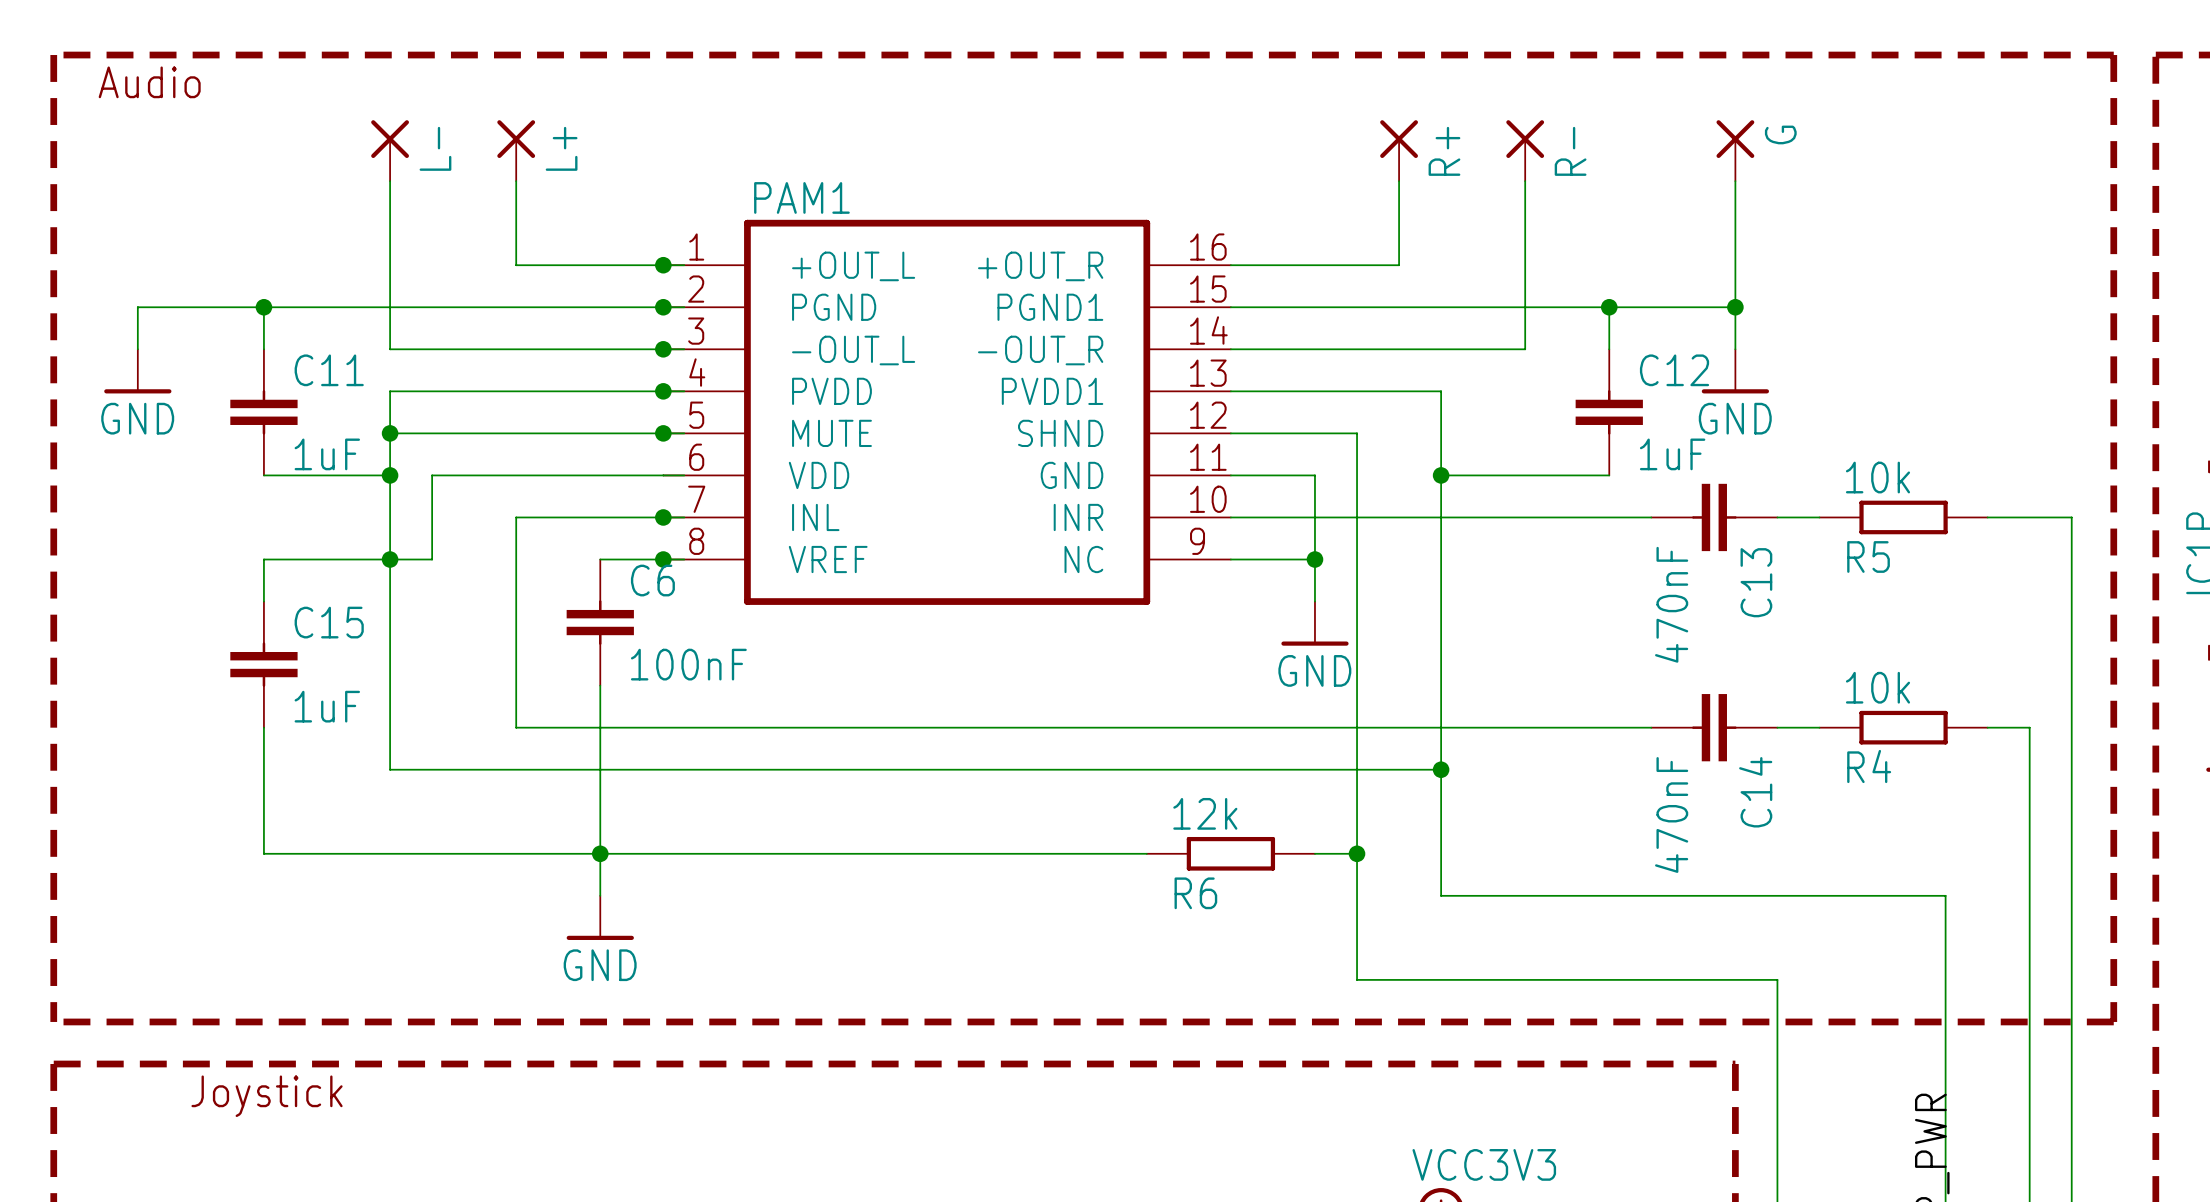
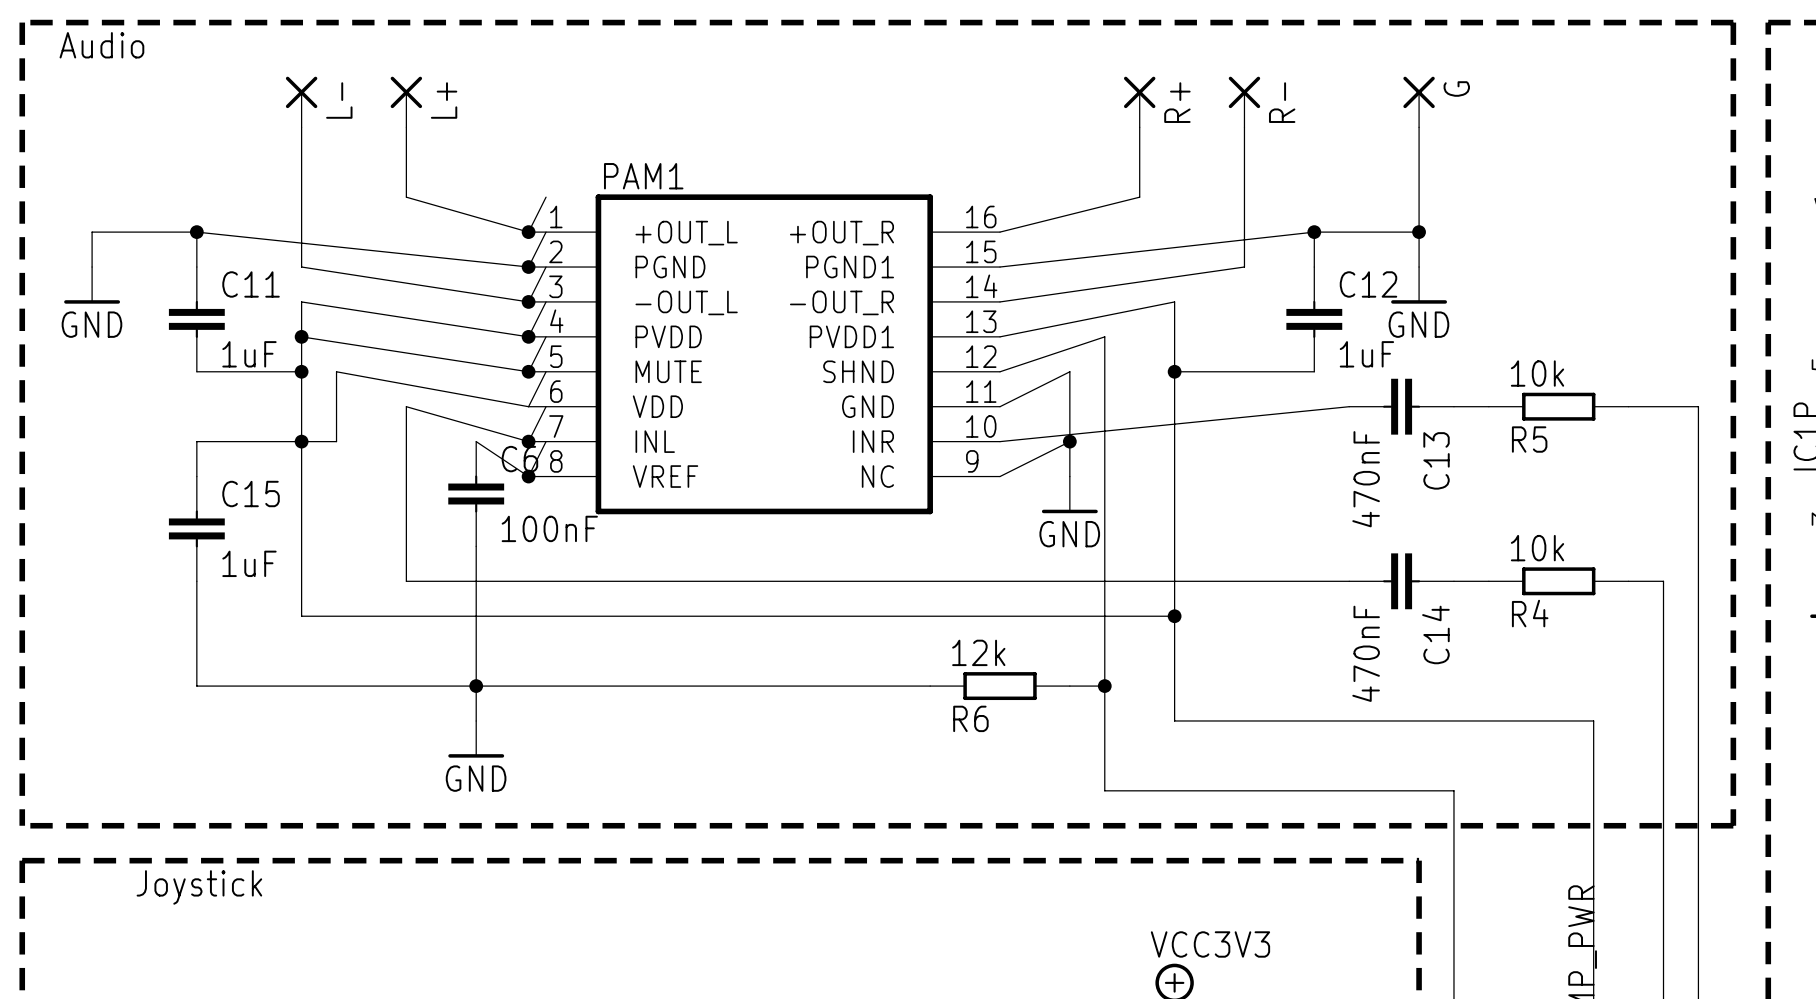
wire: (516, 265) (684, 265) -> (406, 197) (528, 232) (546, 197)
junction: (663, 265) -> none
wire: (1230, 265) (1399, 265) -> (1000, 232) (1139, 197)
wire: (263, 307) (684, 307) -> (196, 232) (528, 267) (546, 232)
wire: (1230, 307) (1609, 307) -> (1000, 267) (1314, 232)
wire: (390, 349) (684, 349) -> (301, 267) (528, 301) (546, 267)
wire: (1230, 349) (1525, 349) -> (1000, 301) (1244, 267)
wire: (390, 391) (684, 391) -> (301, 301) (528, 336) (546, 301)
wire: (1230, 391) (1441, 391) -> (1000, 336) (1174, 301)
PAM1 position: (947, 412) -> (764, 354)
wire: (390, 433) (684, 433) -> (301, 336) (528, 371) (546, 336)
wire: (1230, 433) (1357, 433) -> (1000, 371) (1104, 336)
wire: (432, 475) (684, 475) -> (336, 371) (528, 406) (546, 371)
junction: none -> (528, 371)
wire: (1230, 475) (1314, 475) -> (1000, 406) (1069, 371)
wire: (516, 517) (684, 517) -> (406, 406) (528, 441) (546, 406)
junction: (663, 517) -> none
wire: (1230, 517) (1651, 517) -> (1000, 441) (1349, 406)
wire: (600, 559) (684, 559) -> (476, 441) (528, 476) (546, 441)
wire: (1230, 559) (1314, 559) -> (1000, 476) (1069, 441)
junction: none -> (528, 476)

